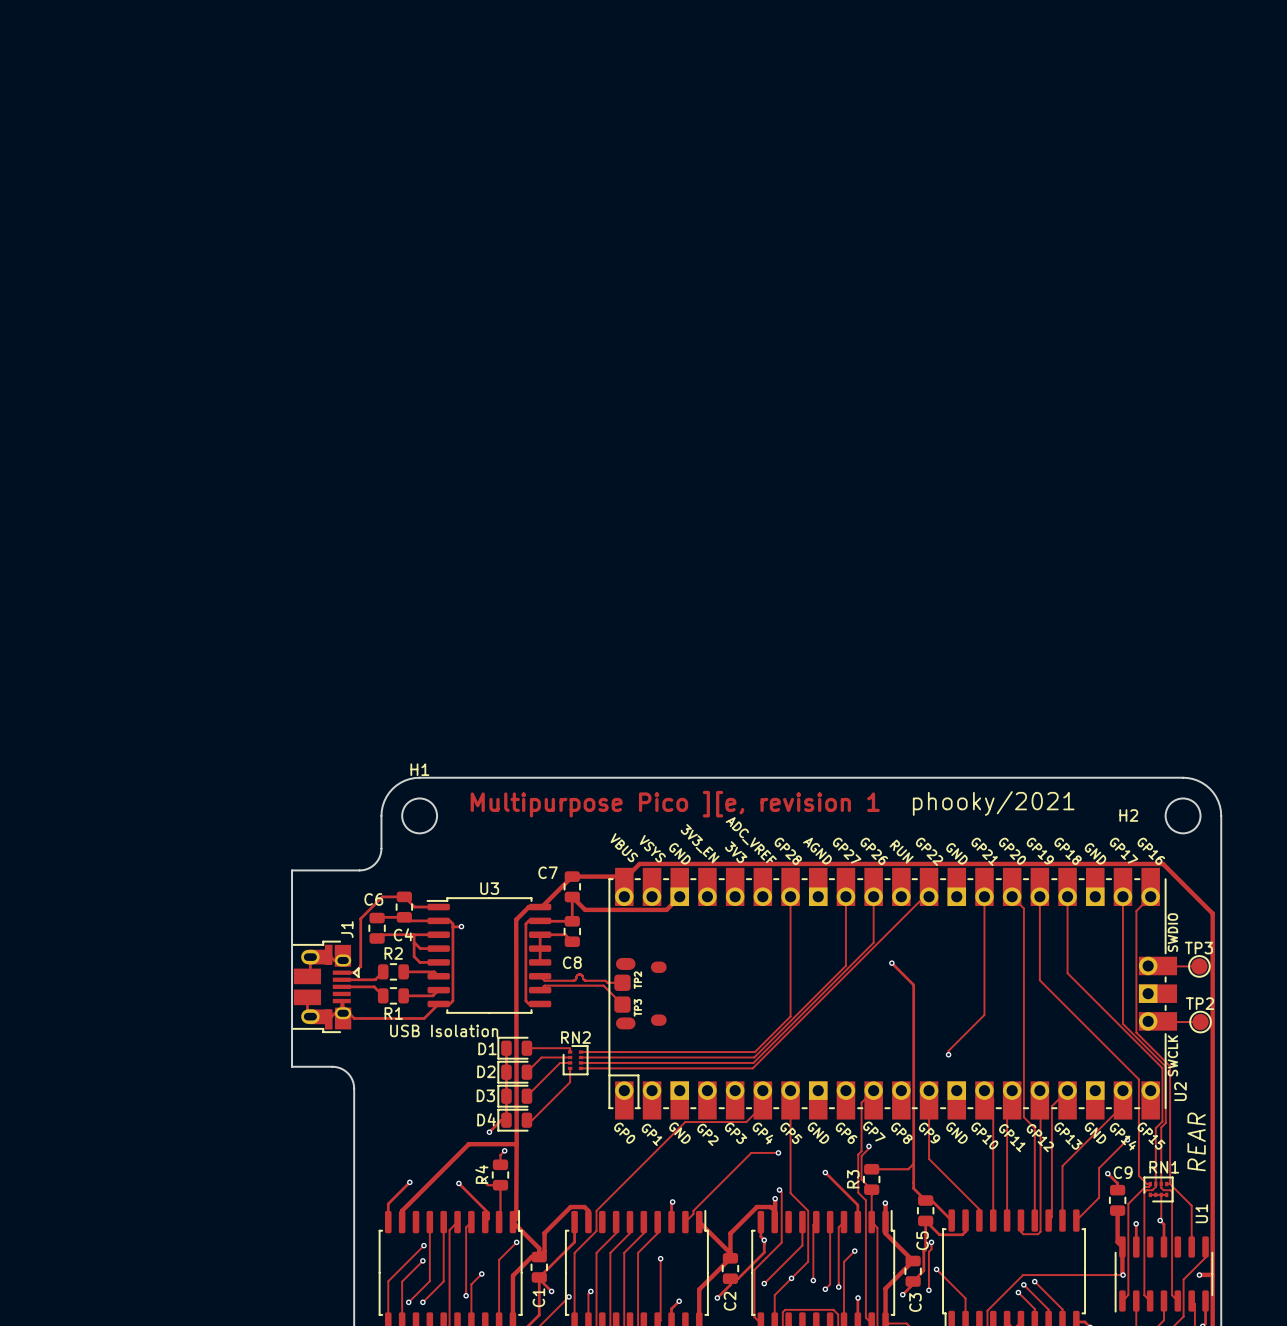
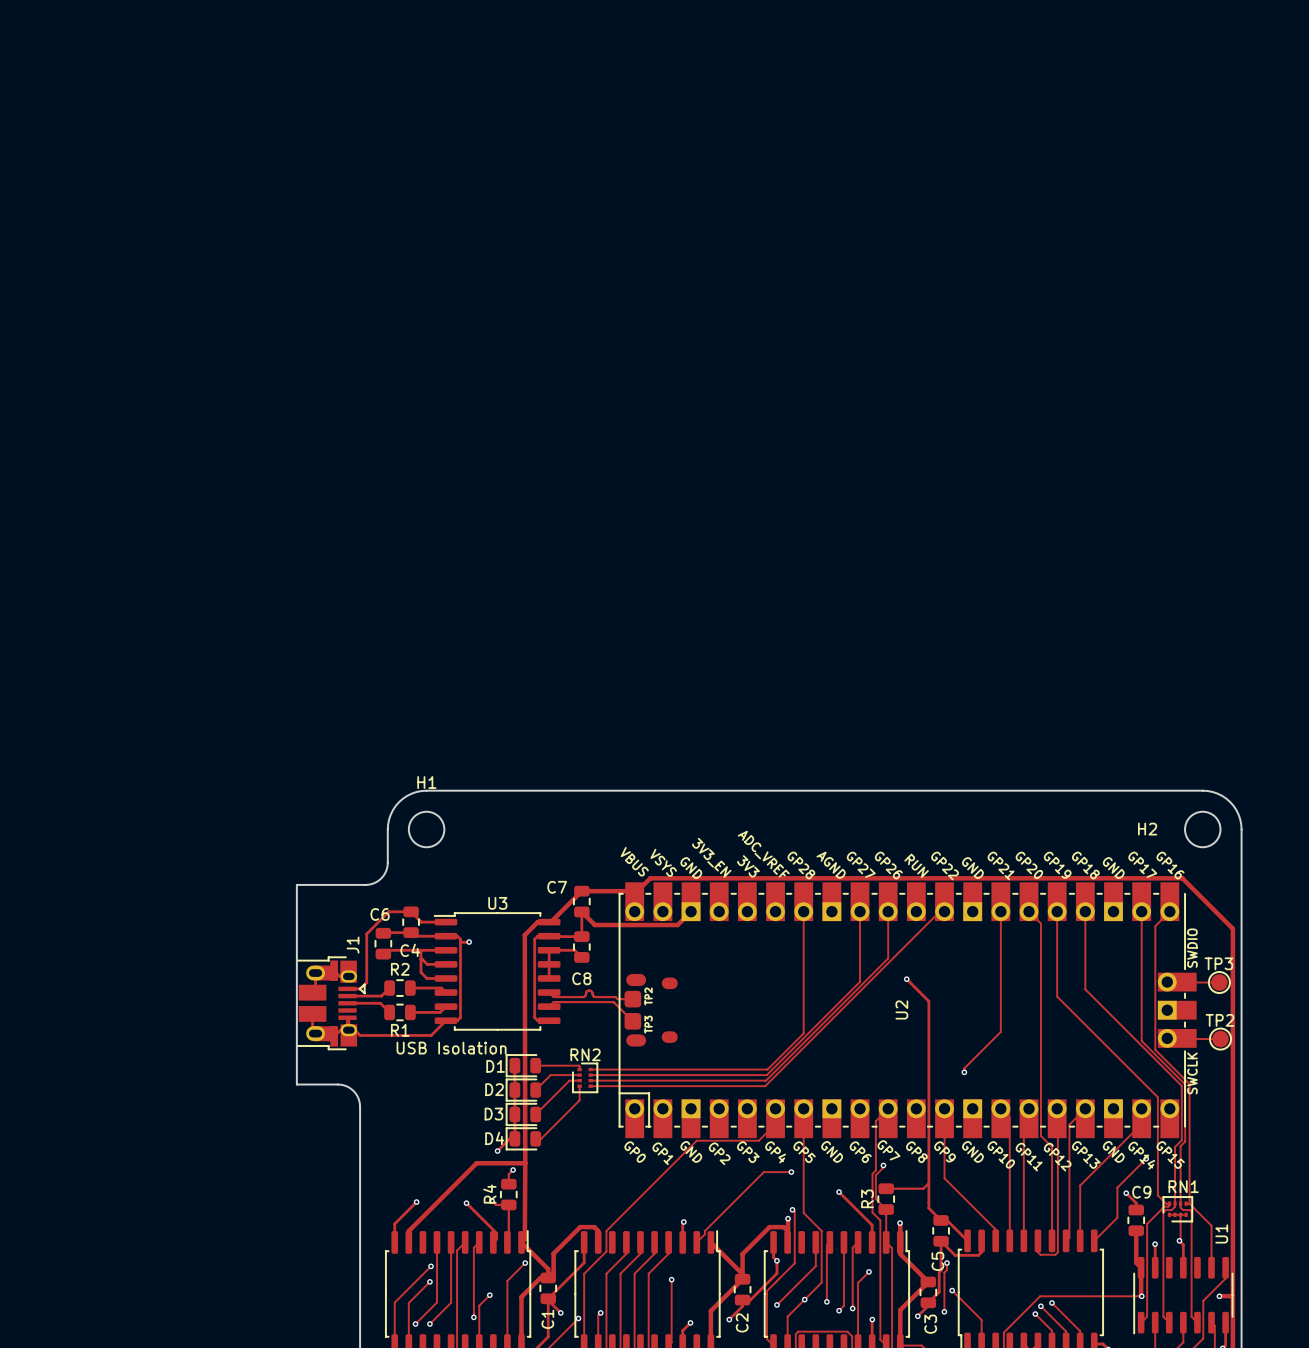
text: phooky/2021 (993, 803) -> none
text: Multipurpose Pico ][e, revision 1 (675, 804) -> none
U2 name position: U2 (1180, 1091) -> U2 (901, 1009)
text: REAR (1196, 1141) -> none

